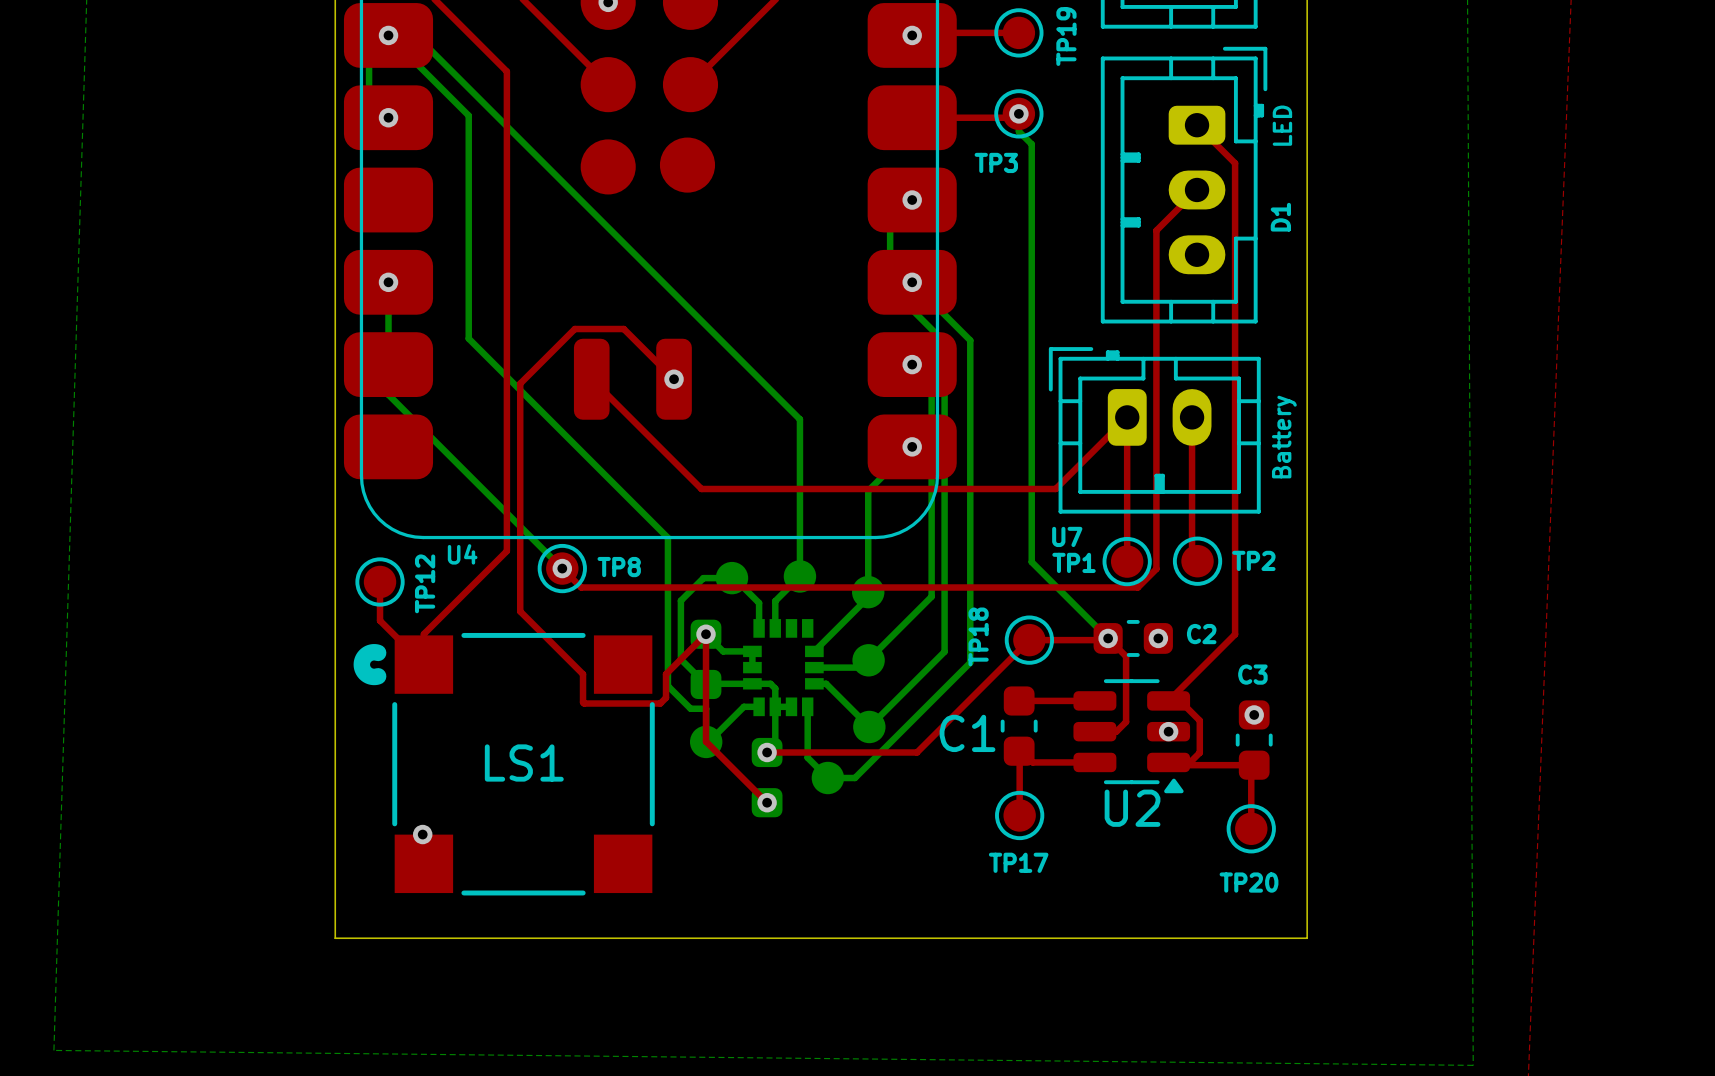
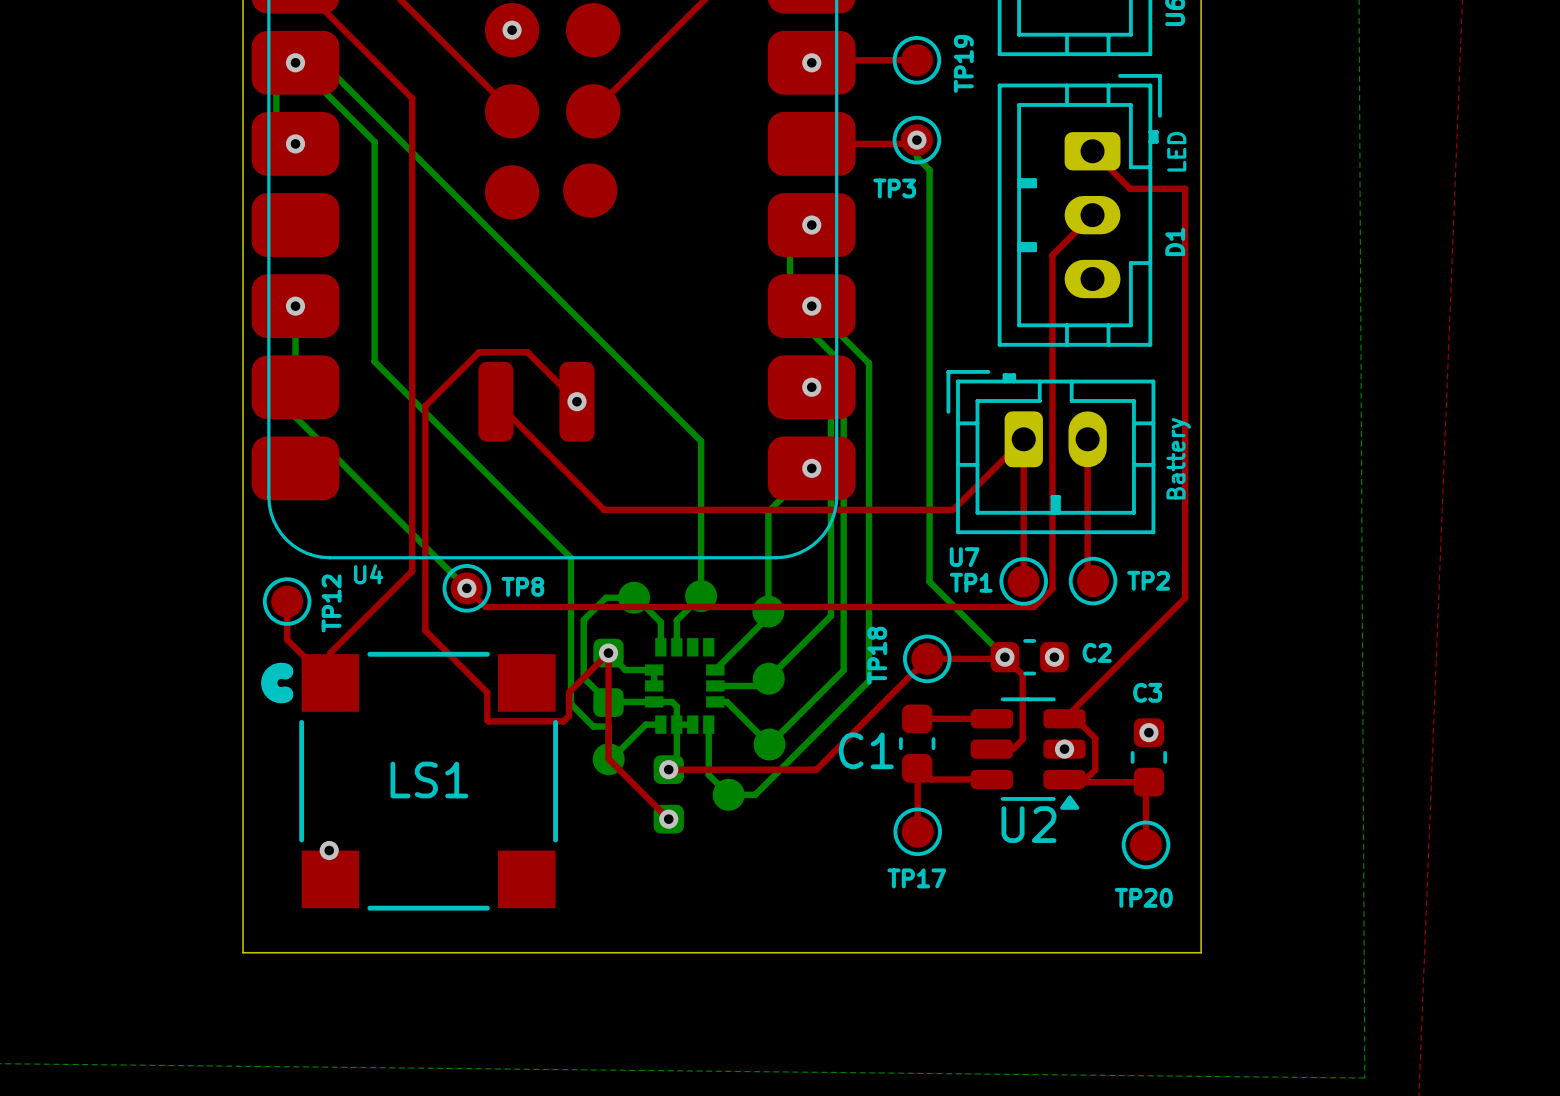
top track: (1235, 163) (1235, 634) -> (1130, 188) (1185, 188) (1185, 598) (1130, 653)

